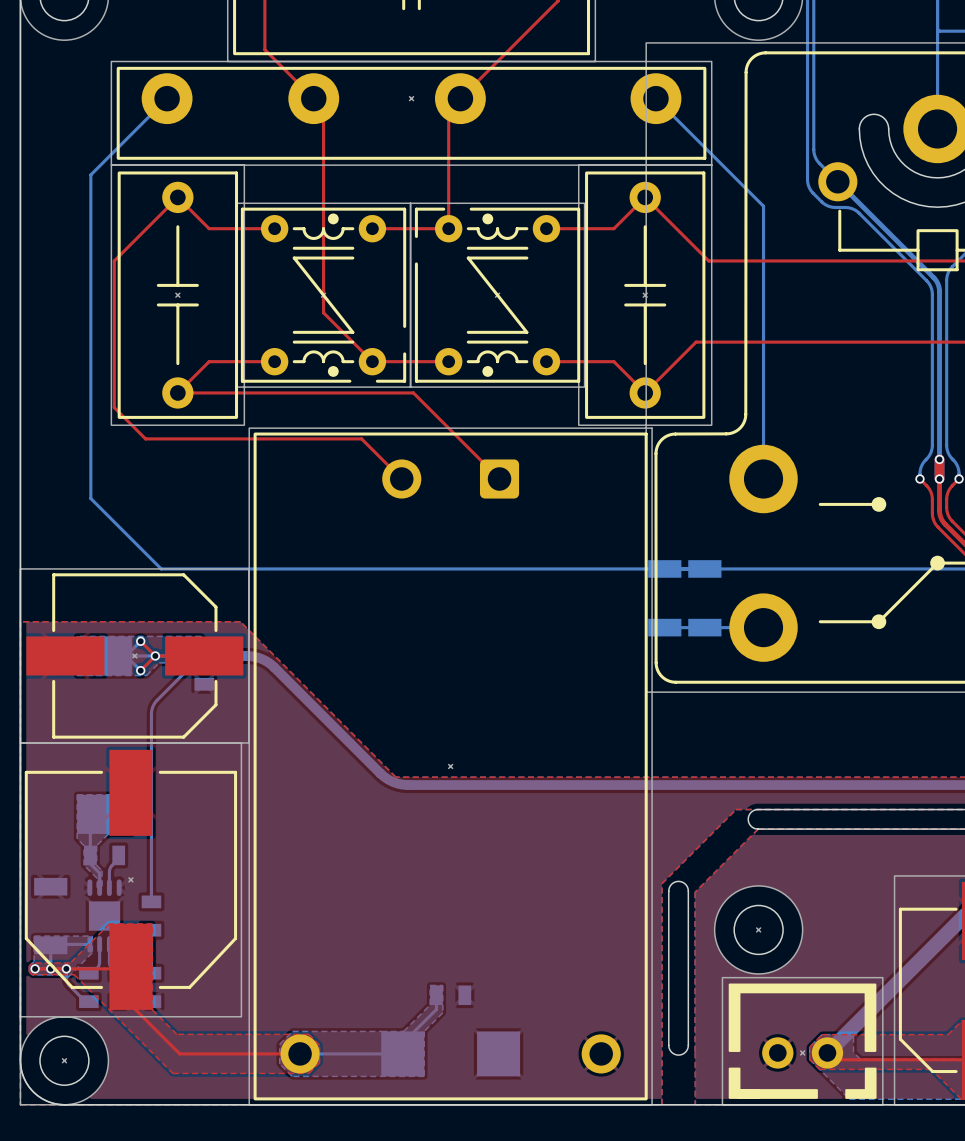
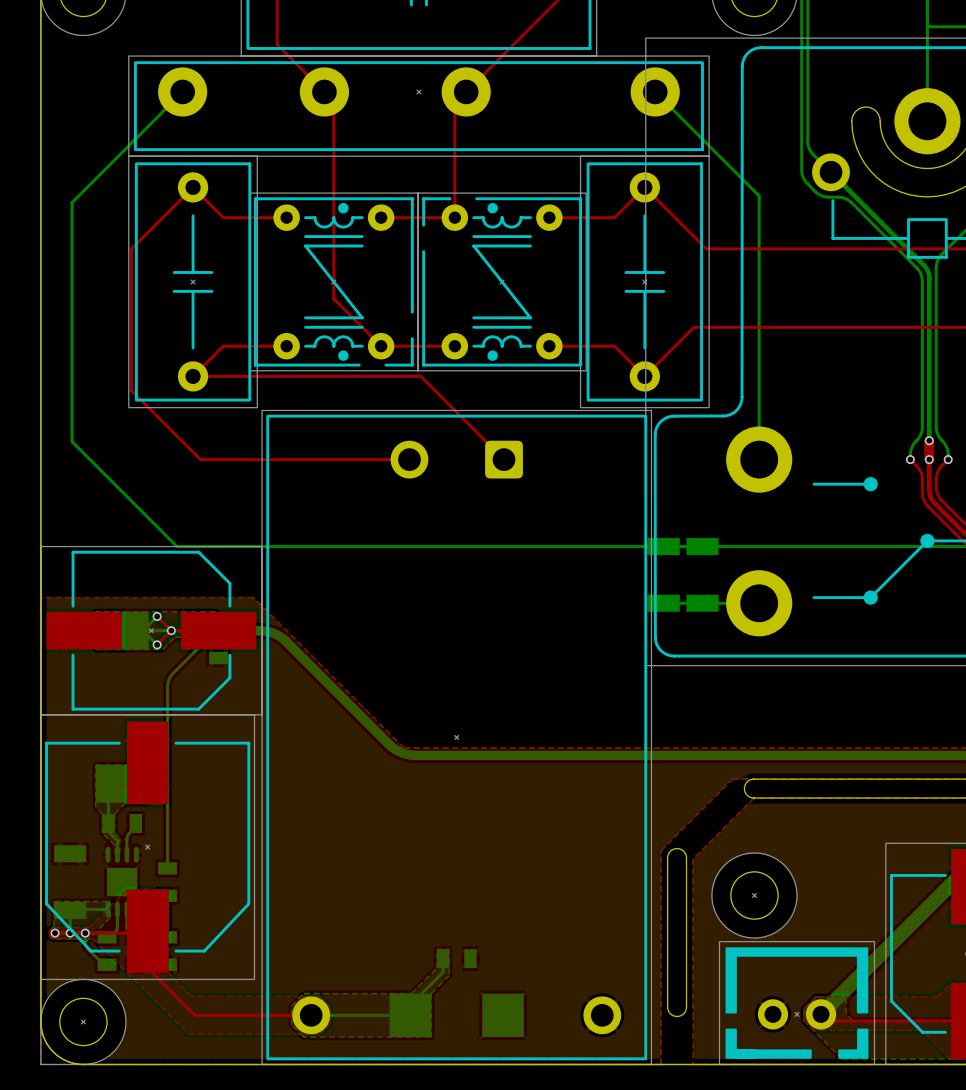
bottom track: (90, 174) (90, 498) -> (108, 165) (72, 202) (72, 441) (108, 478)
top track: (145, 438) (361, 438) (401, 479) -> (161, 420) (200, 459) (409, 459)

